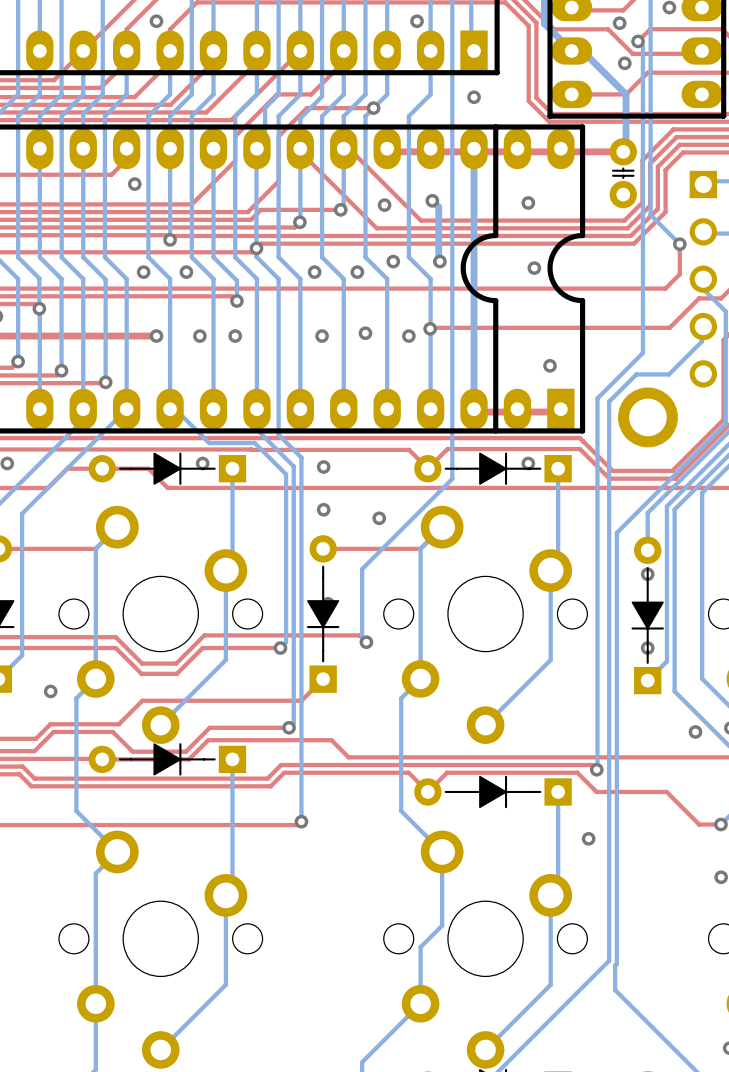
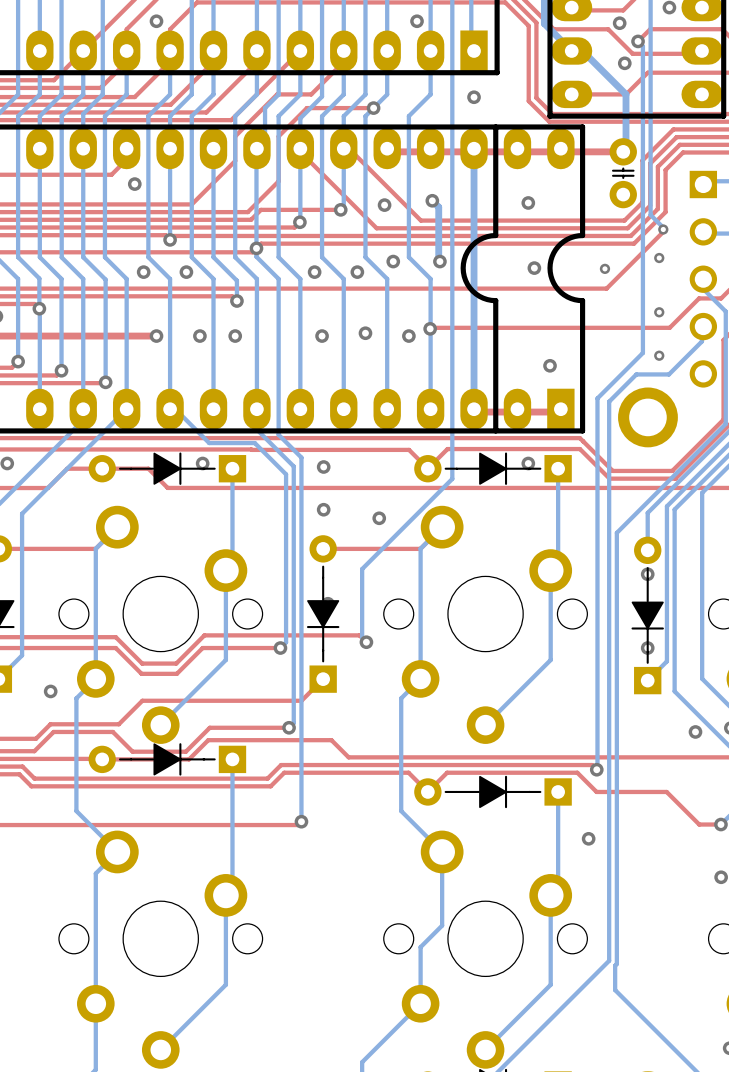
via: none -> (663, 229)
bottom track: (665, 229) (679, 244) -> none
top track: (679, 244) (679, 274) (665, 288) (606, 288) -> (663, 229) (665, 229) (606, 288)
via: (679, 244) -> none
via: none -> (659, 258)
via: none -> (604, 268)
via: none -> (659, 312)
via: none -> (659, 355)

